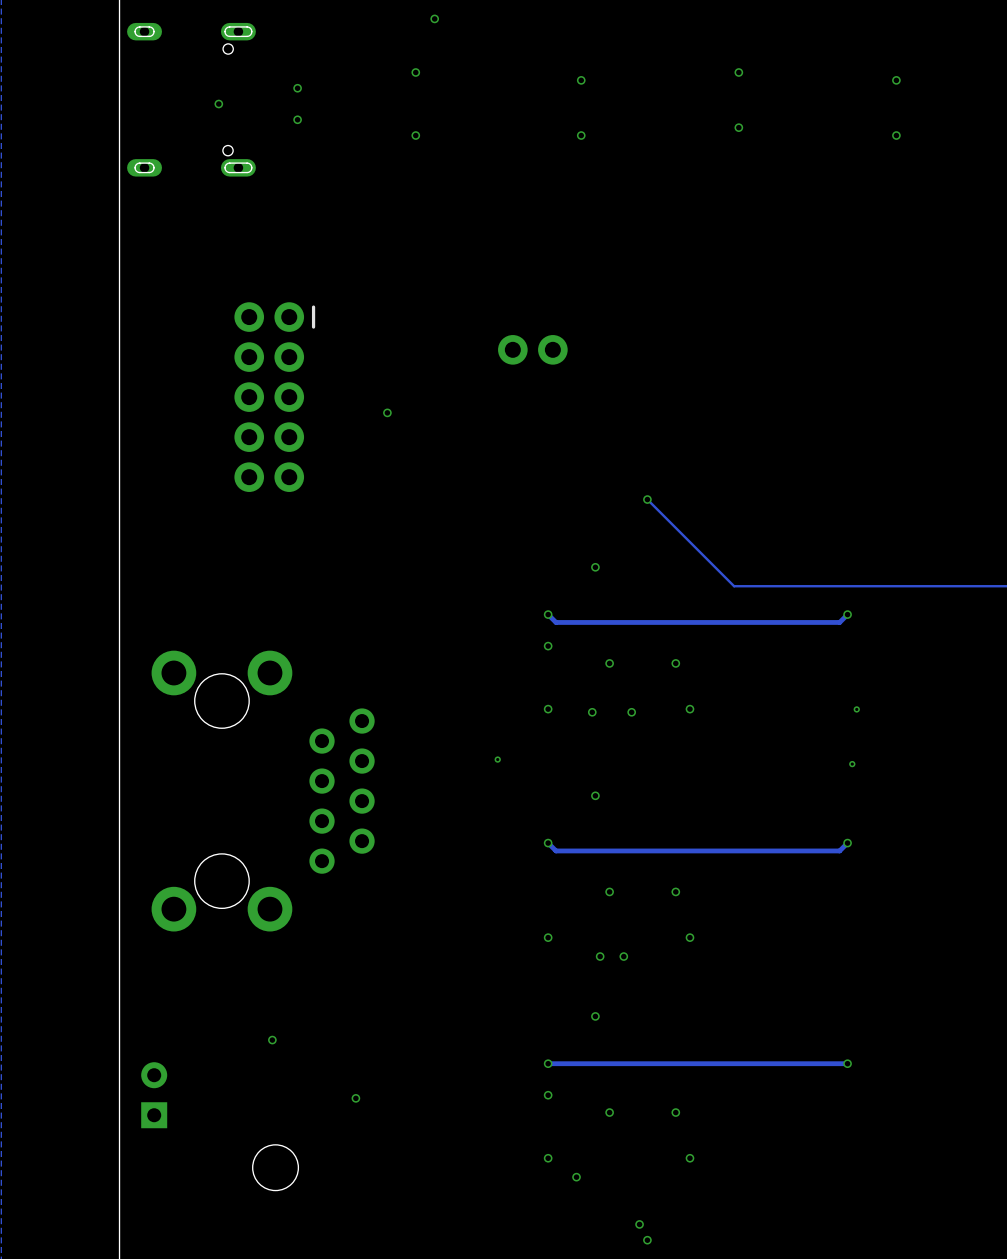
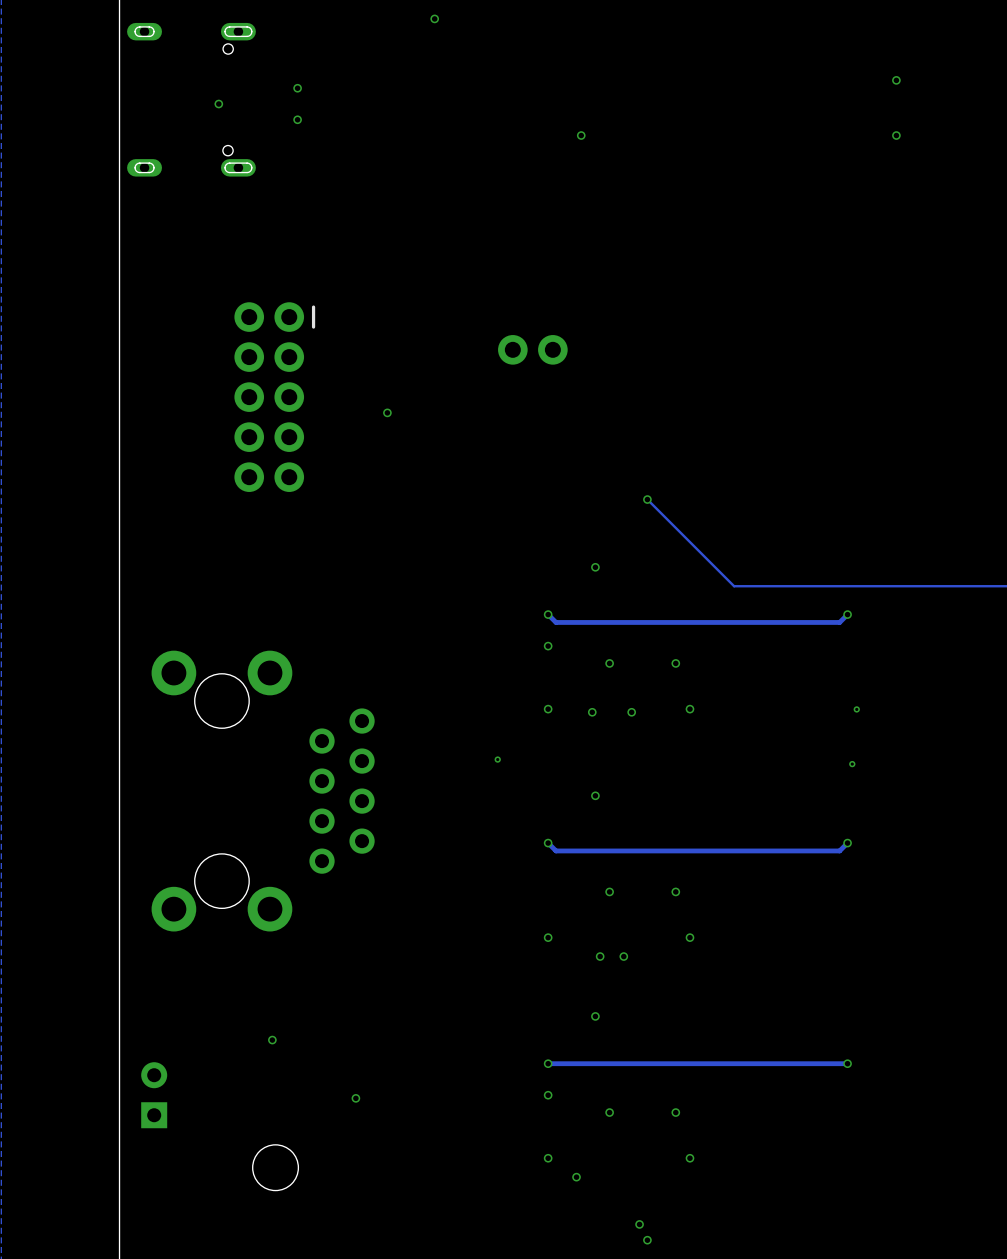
via: (415, 72) -> none
via: (738, 72) -> none
via: (581, 80) -> none
via: (738, 127) -> none
via: (415, 135) -> none

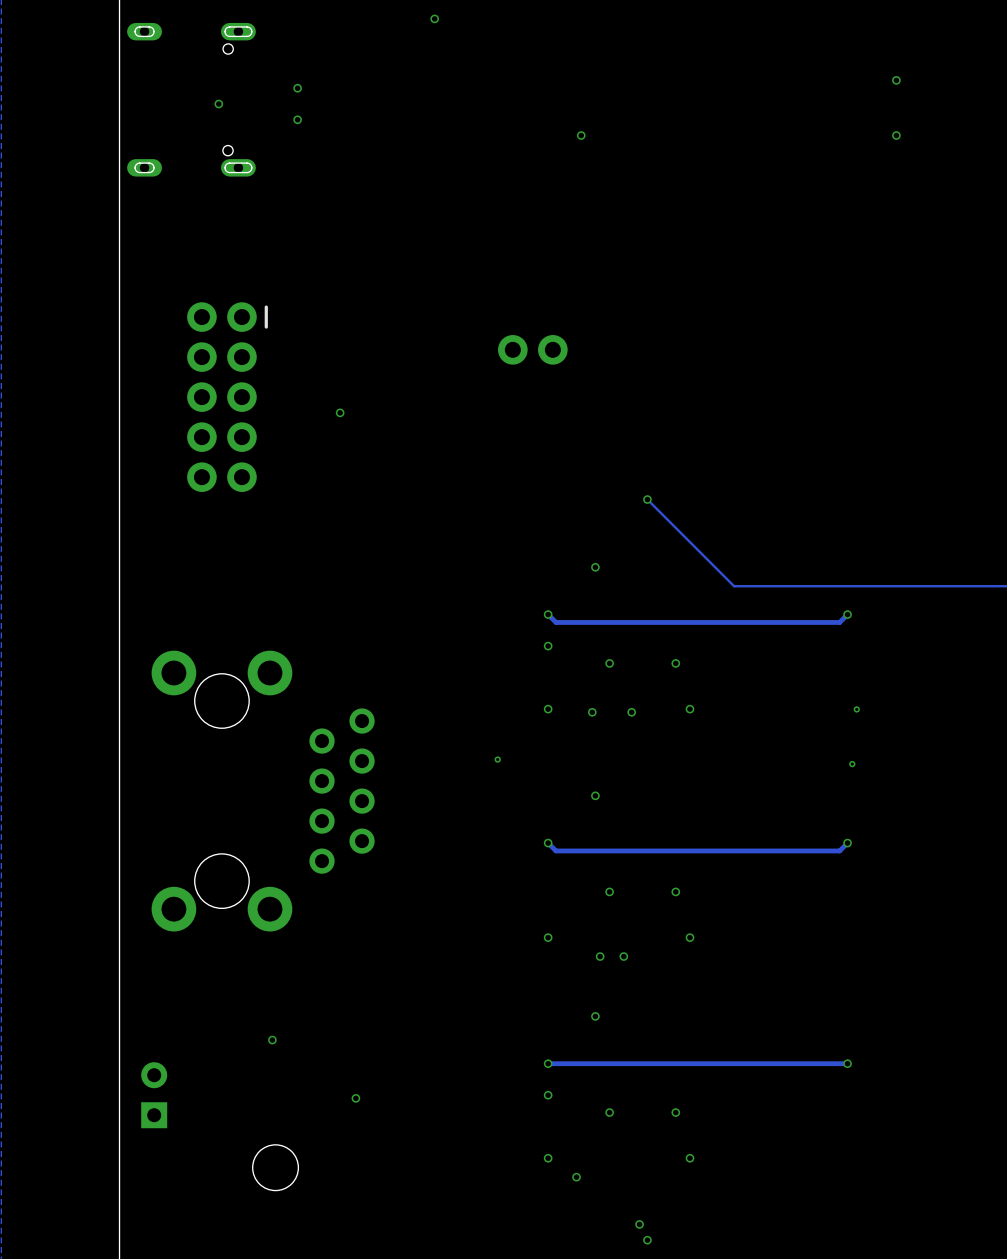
part position: (274, 397) -> (227, 397)
via position: (387, 412) -> (340, 412)

